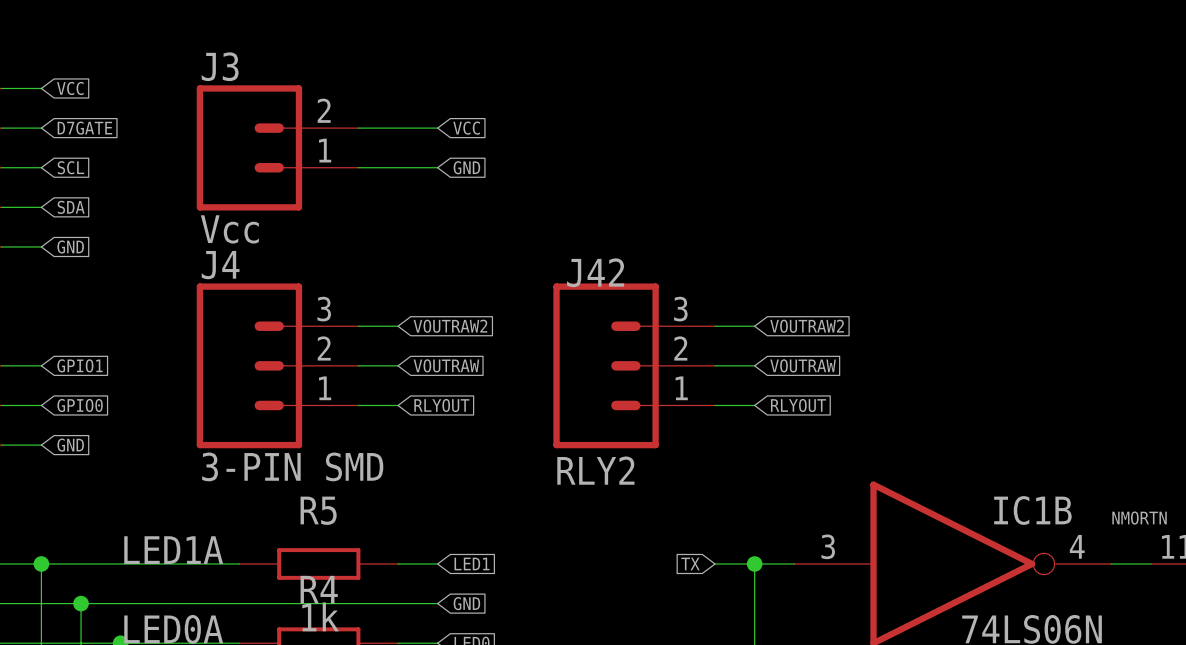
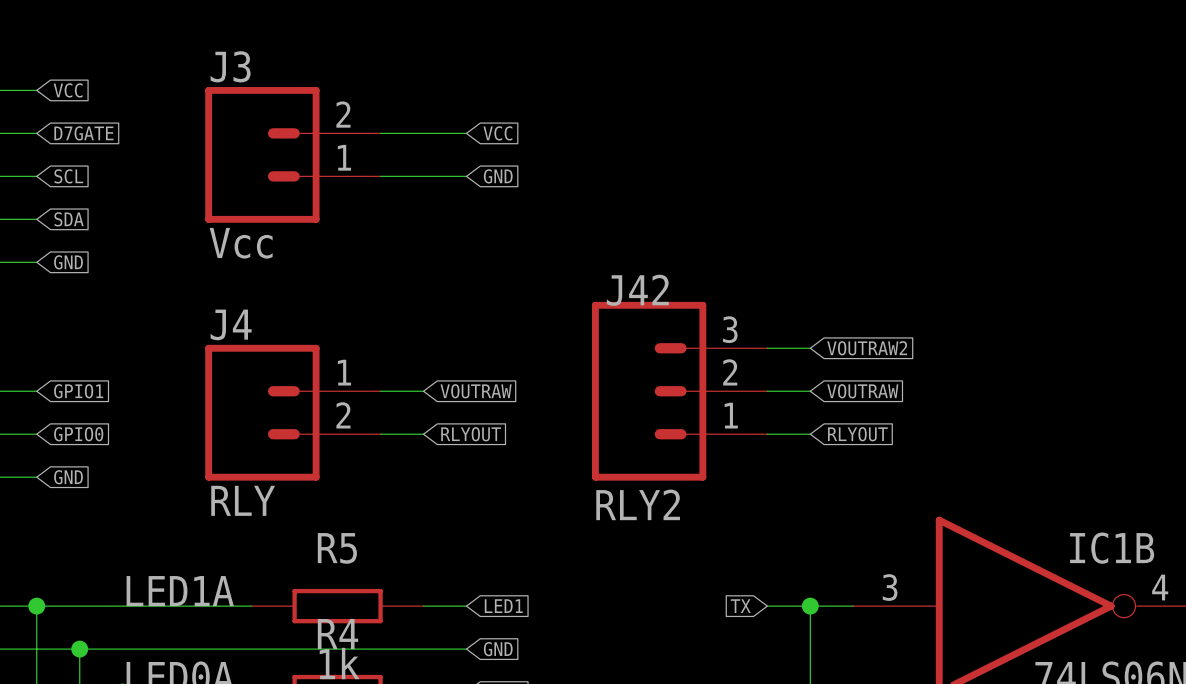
J4 symbol: [196, 283, 359, 449] -> [205, 344, 381, 481]
wire: (358, 326) (398, 326) -> none
global label: VOUTRAW2 (450, 326) -> none
J4 value: 3-PIN SMD (292, 466) -> RLY (243, 500)

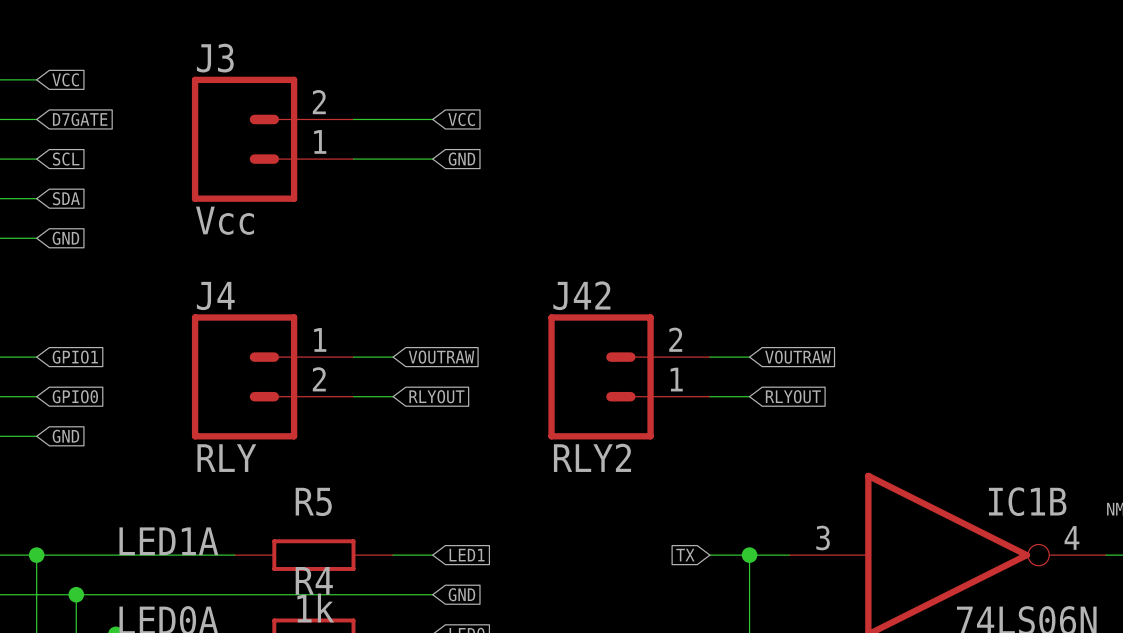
J42 symbol: [592, 301, 768, 481] -> [548, 314, 710, 440]
wire: (767, 348) (810, 348) -> none
global label: VOUTRAW2 (867, 348) -> none

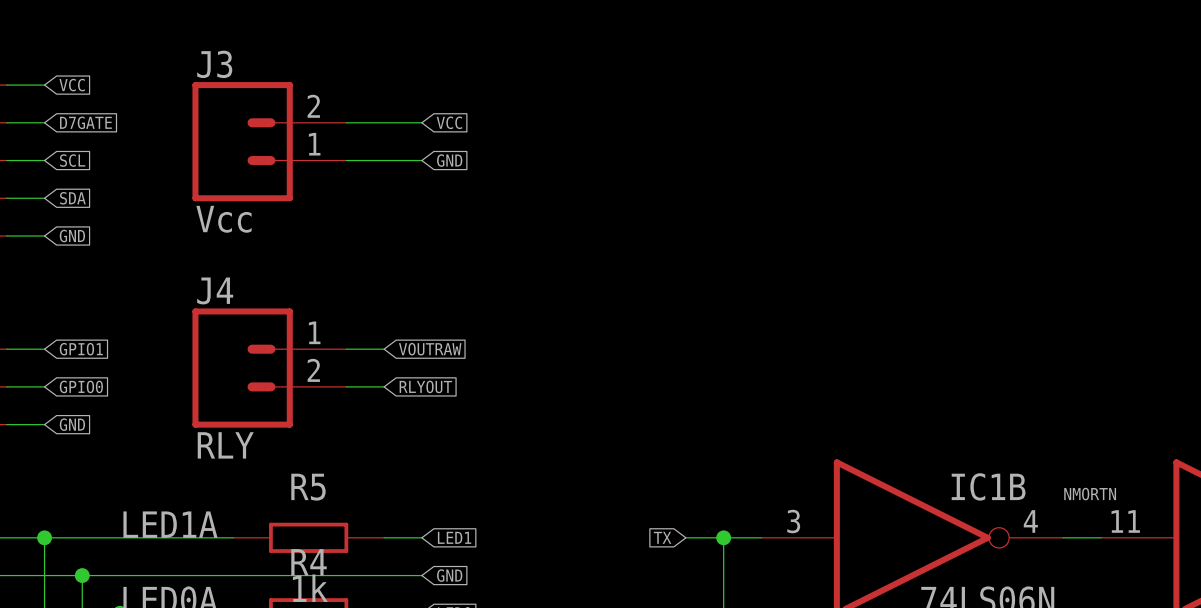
wire: (709, 357) (749, 357) -> none
global label: VOUTRAW (797, 357) -> none
J42: RLY2 (629, 376) -> none
wire: (709, 396) (749, 396) -> none
global label: RLYOUT (793, 396) -> none

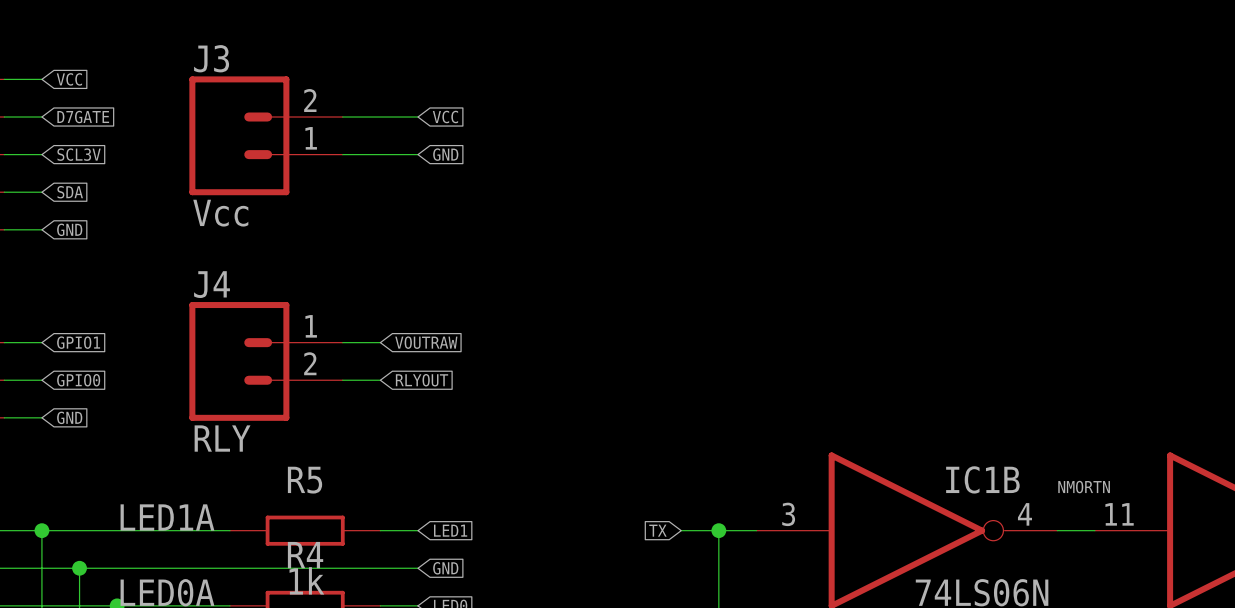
global label: SCL (72, 160) -> SCL3V (79, 154)

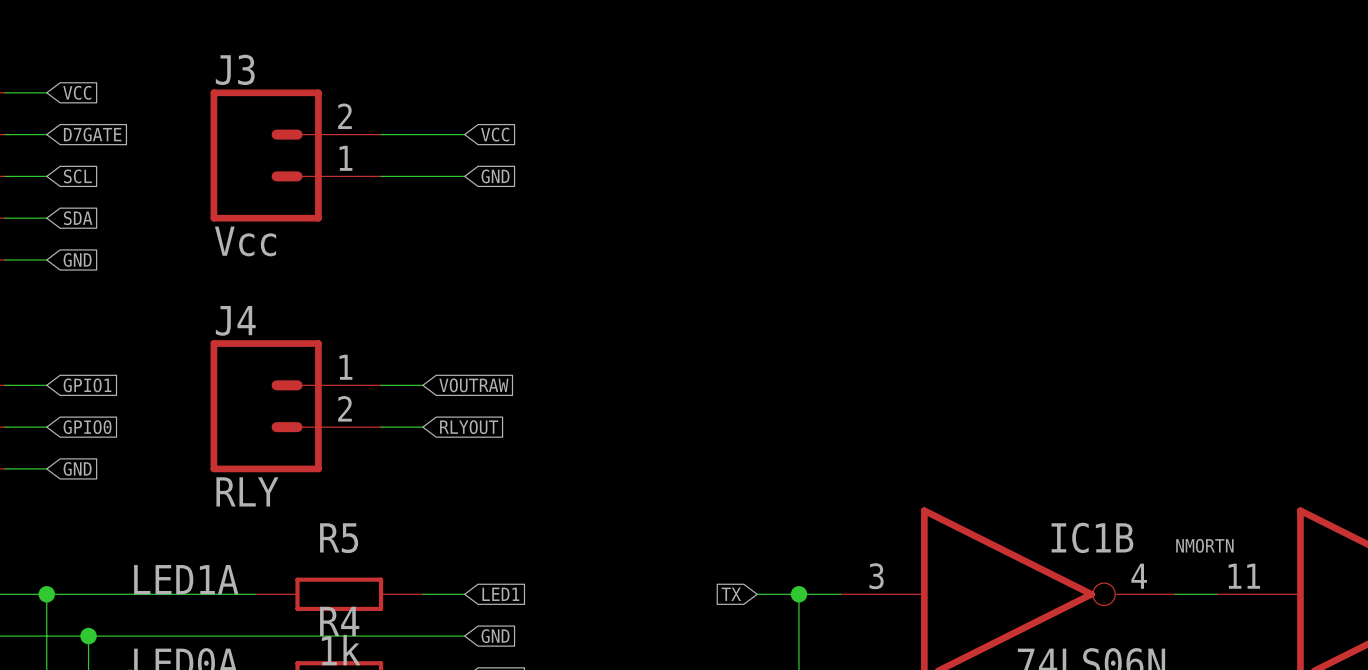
global label: SCL3V (79, 154) -> SCL (77, 176)

